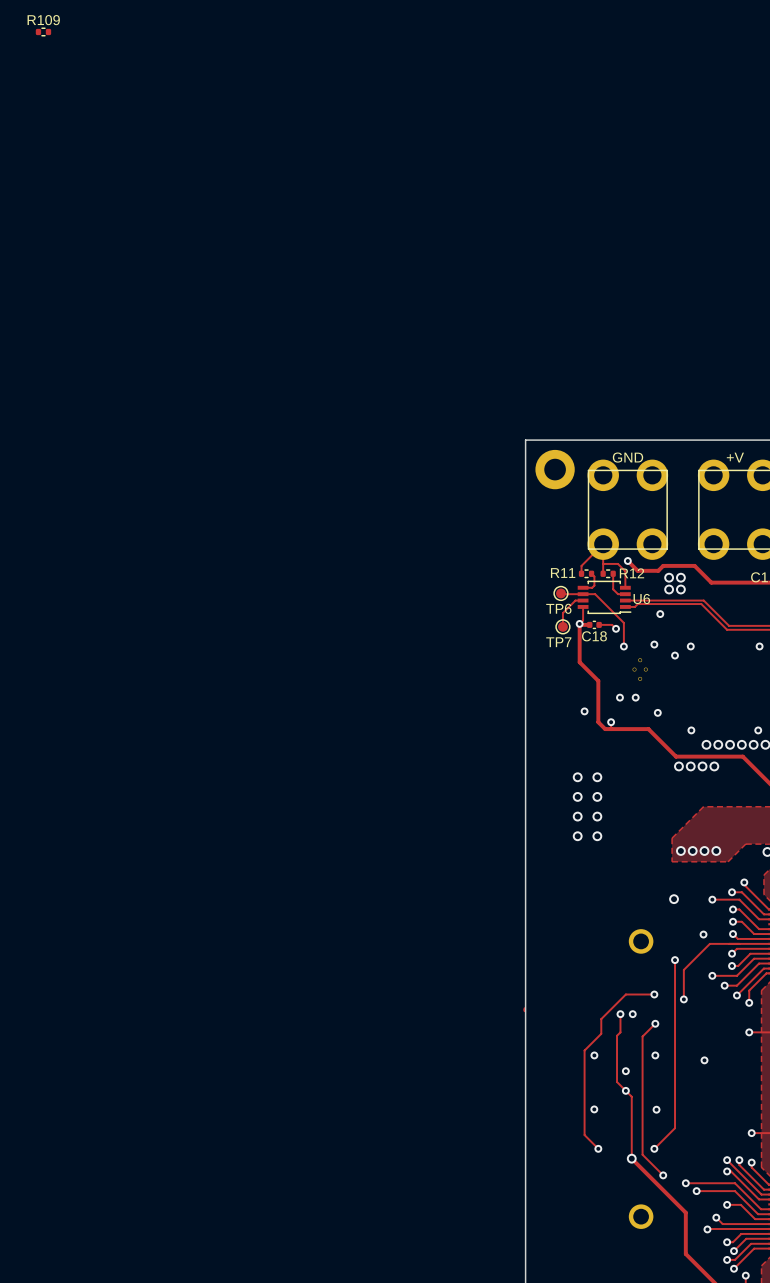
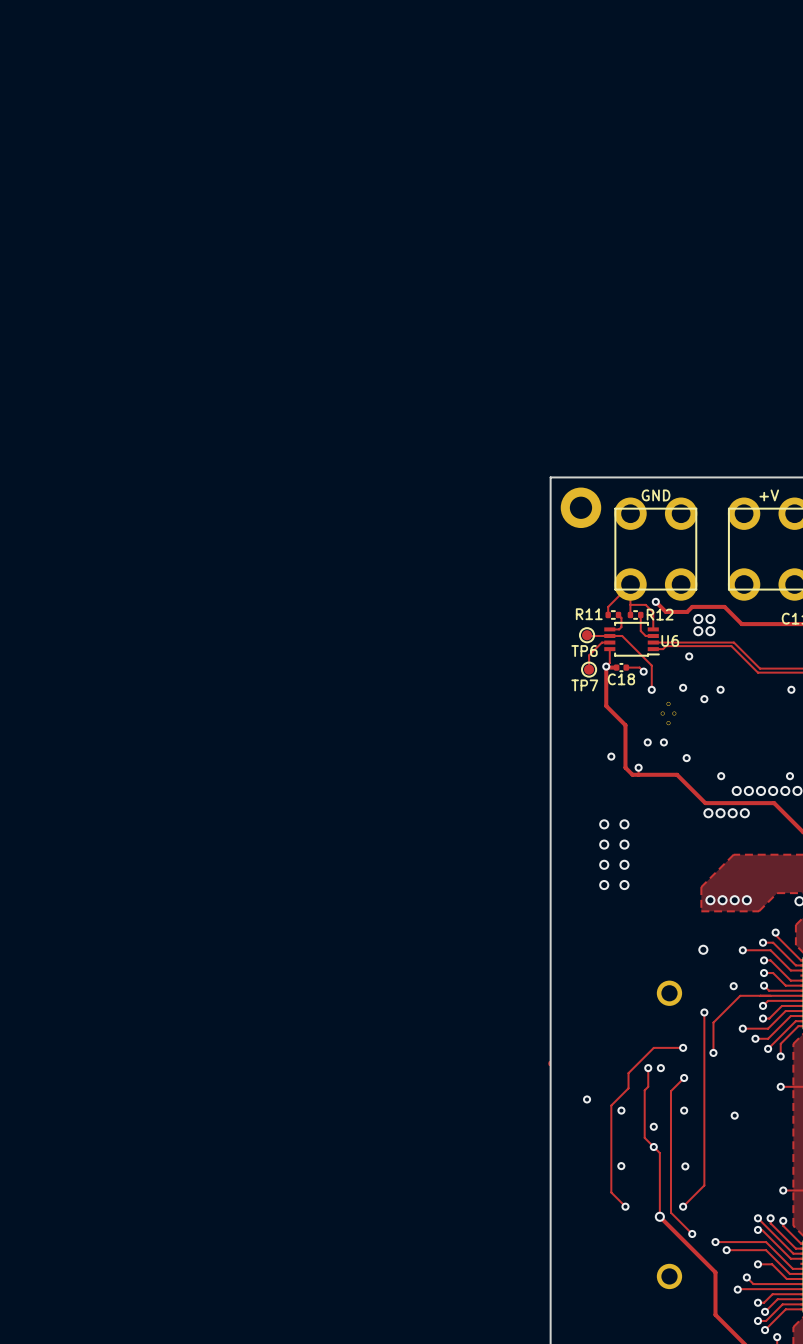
R109: (43, 31) -> none
via: none -> (587, 1099)

